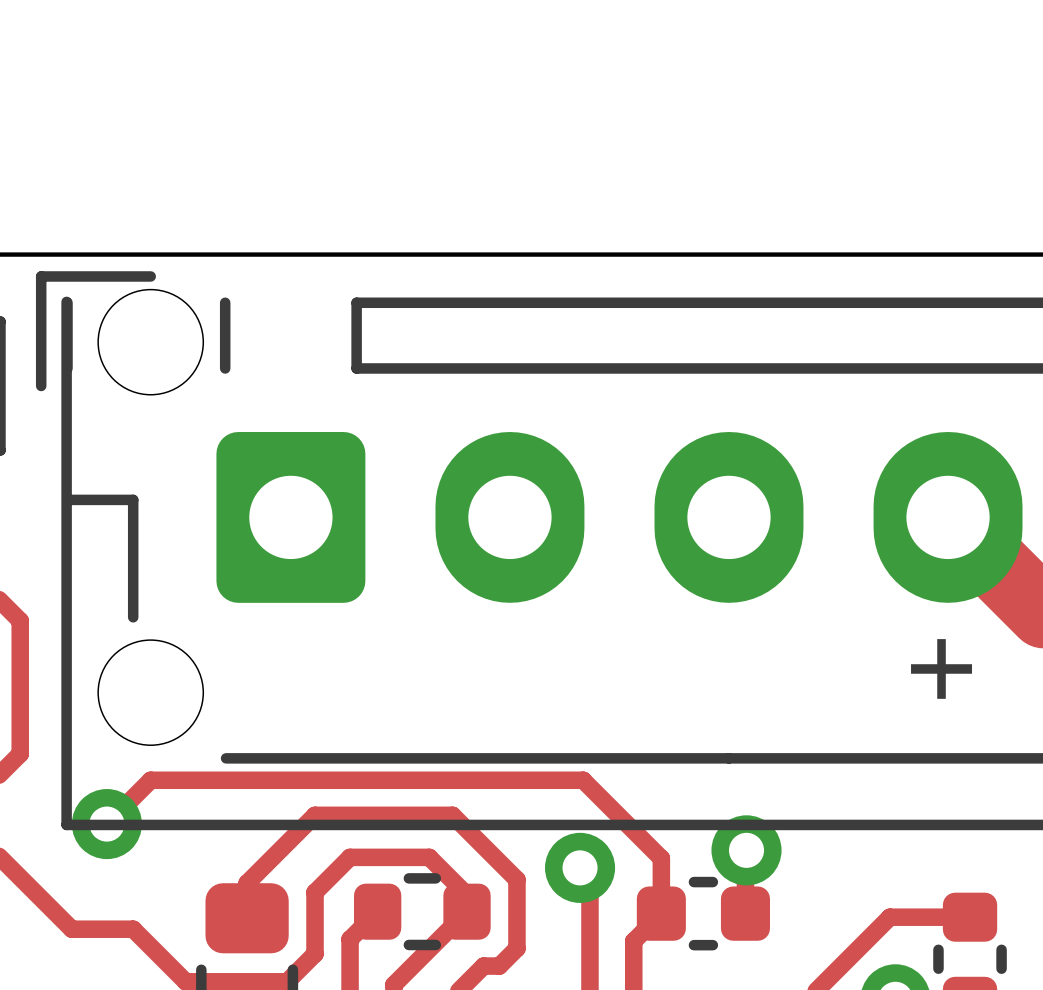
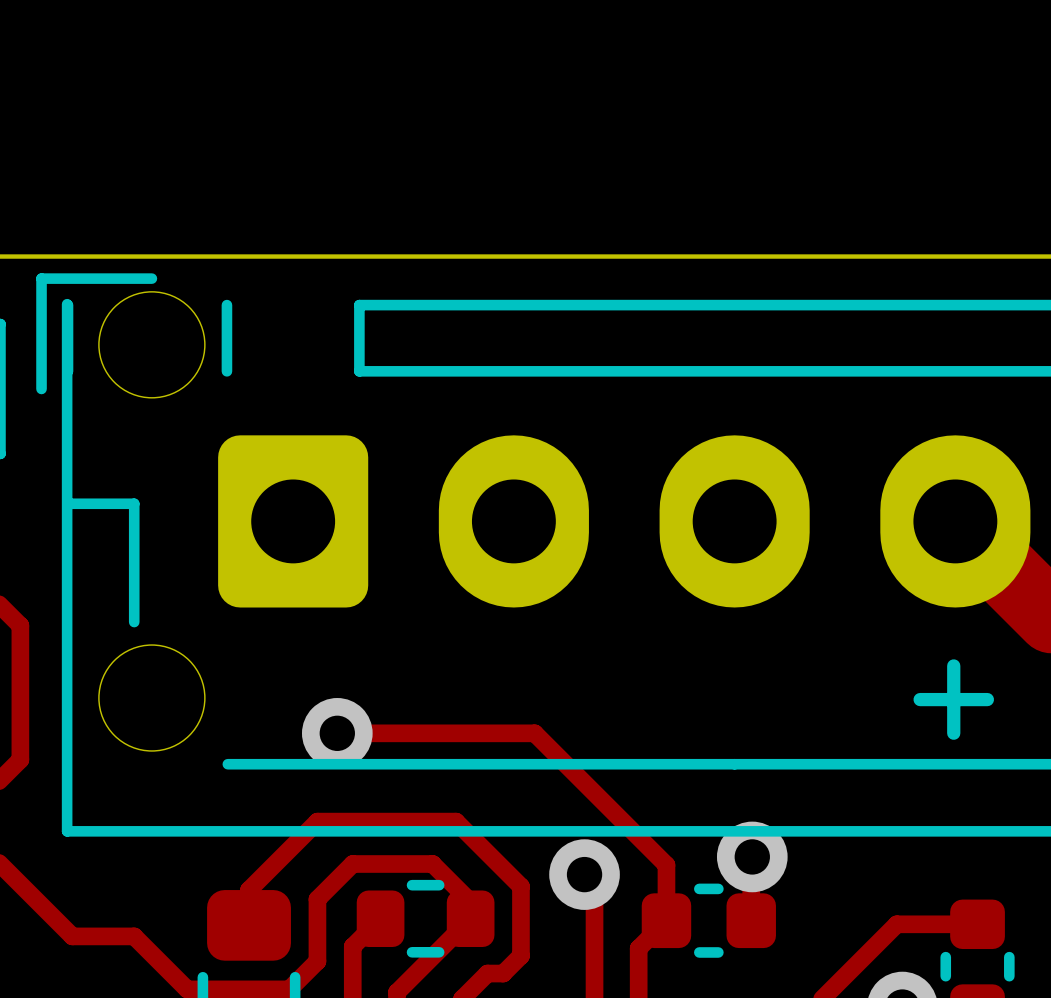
via: none -> (337, 733)
track: (583, 780) (150, 780) (106, 824) -> (587, 786) (534, 733) (337, 733)
via: (106, 824) -> none

